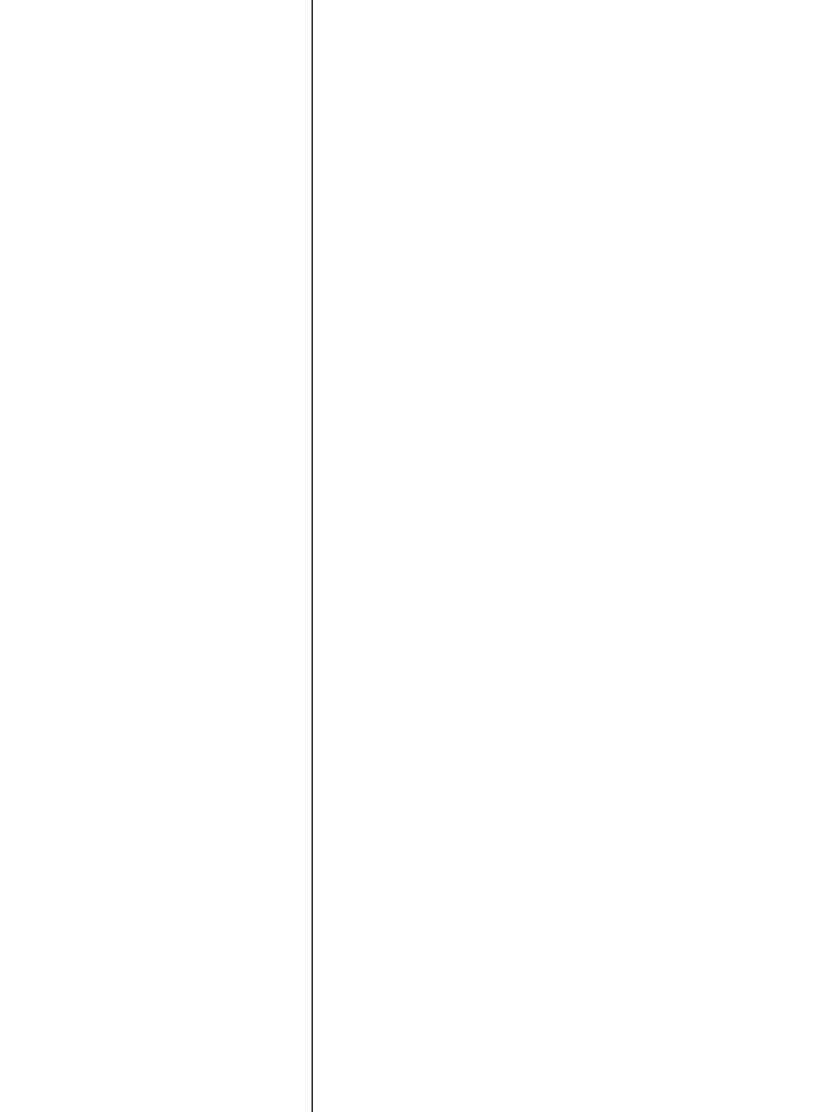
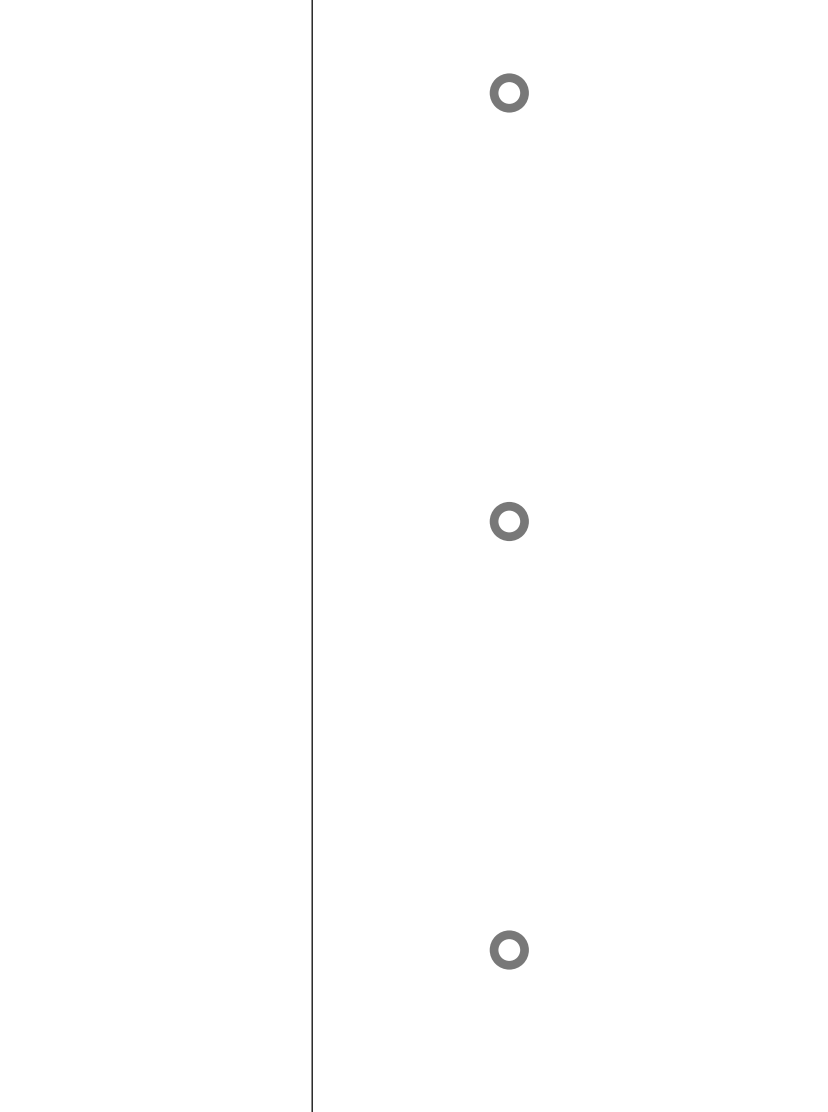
via: none -> (509, 92)
via: none -> (509, 521)
via: none -> (509, 950)

